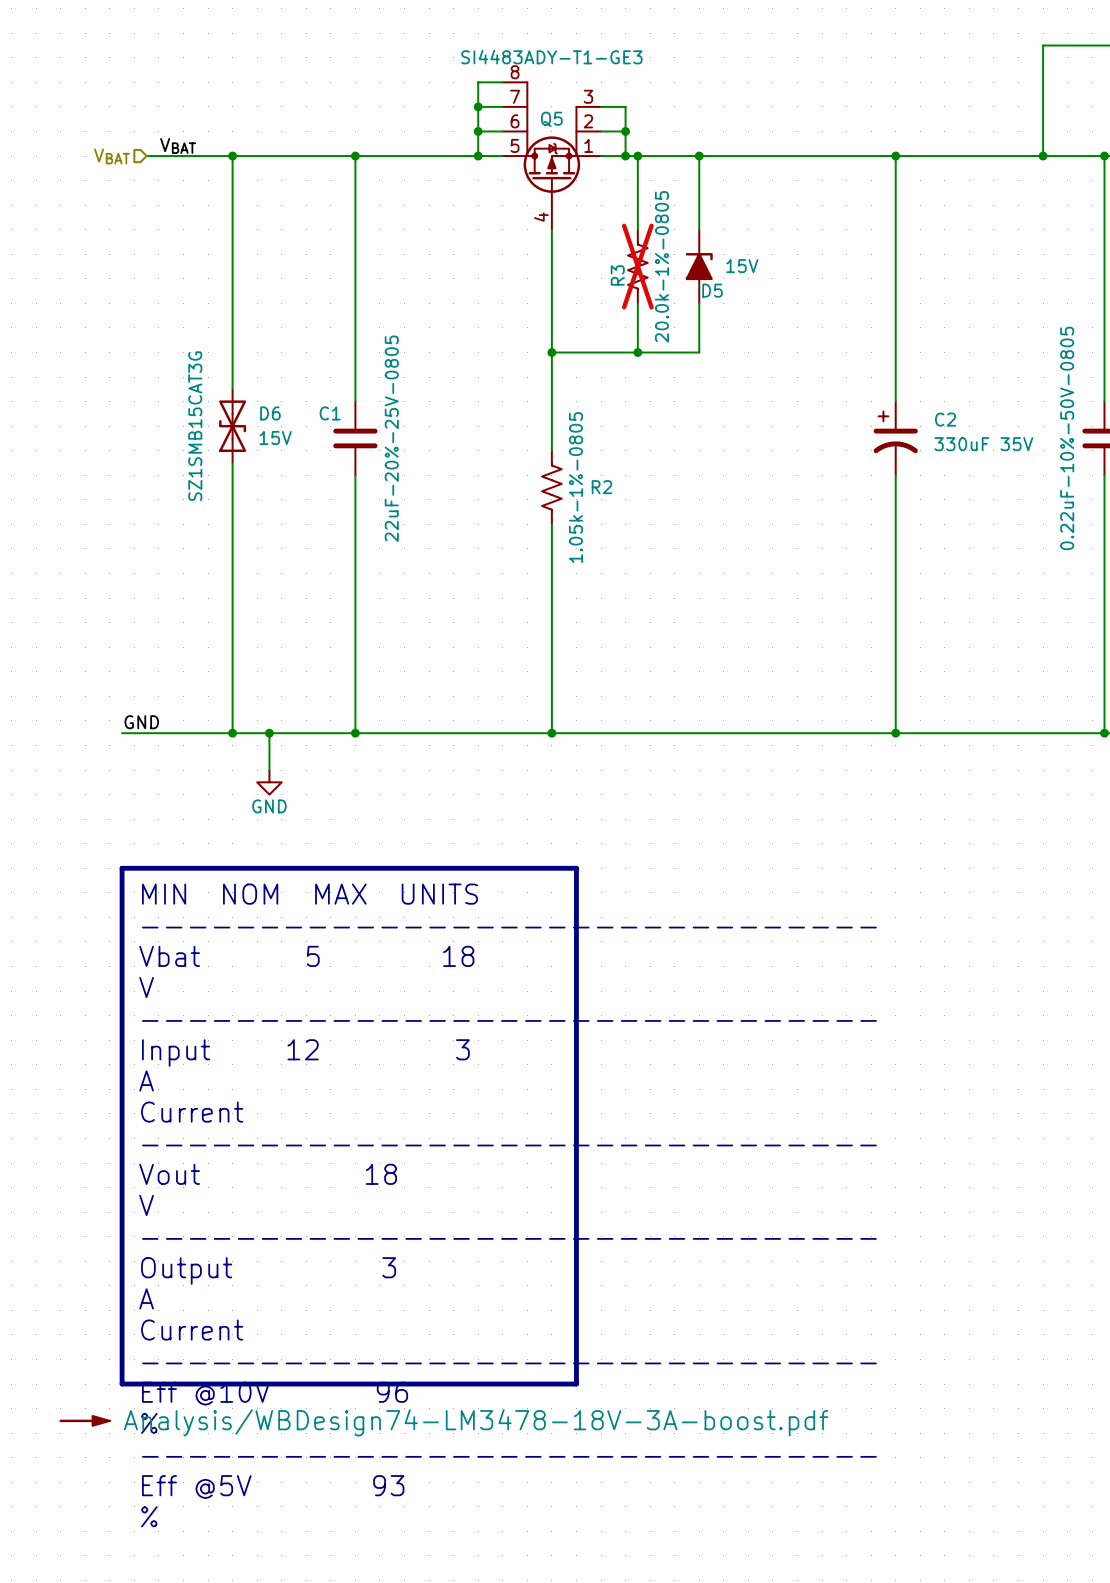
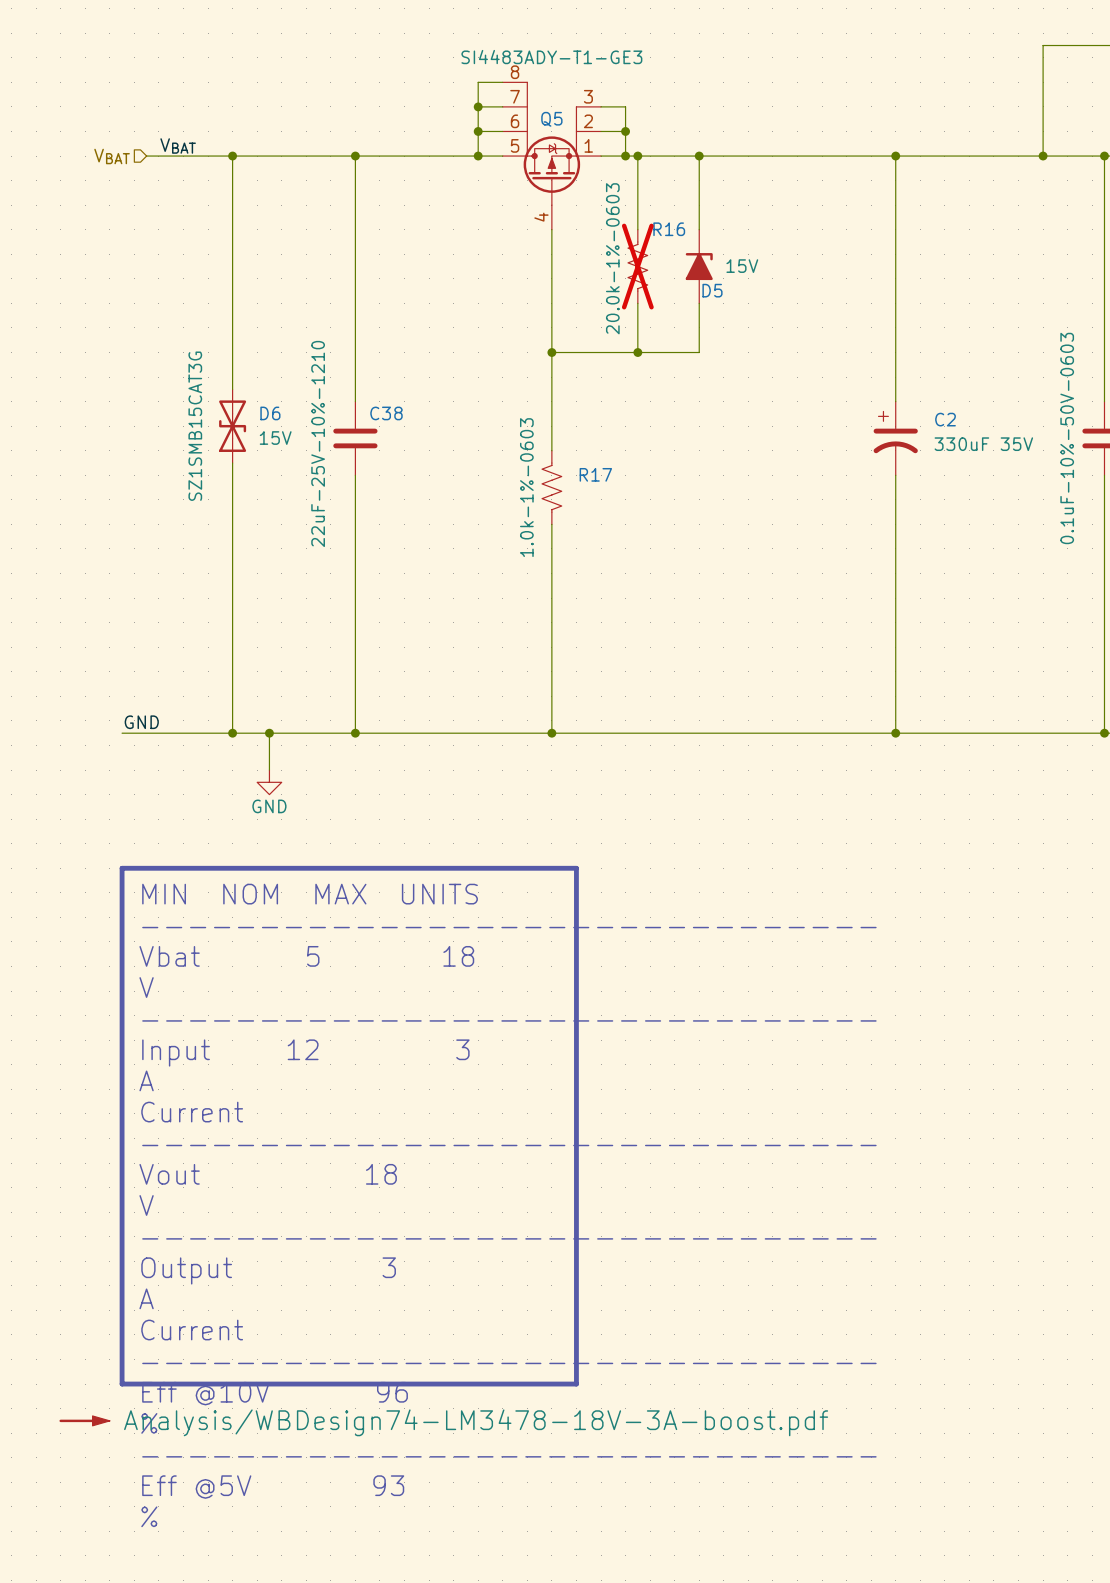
R3: 20.0k-1%-0805 (637, 266) -> none
R16: none -> 20.0k-1%-0603 (637, 266)
C1 name: C1 (330, 413) -> C38 (386, 413)
C1 value: 22uF-20%-25V-0805 (391, 438) -> 22uF-25V-10%-1210 (318, 443)
part value: 0.22uF-10%-50V-0805 (1067, 438) -> 0.1uF-10%-50V-0603 (1067, 438)
R2: 1.05k-1%-0805 (551, 487) -> none
R17: none -> 1.0k-1%-0603 (551, 487)

